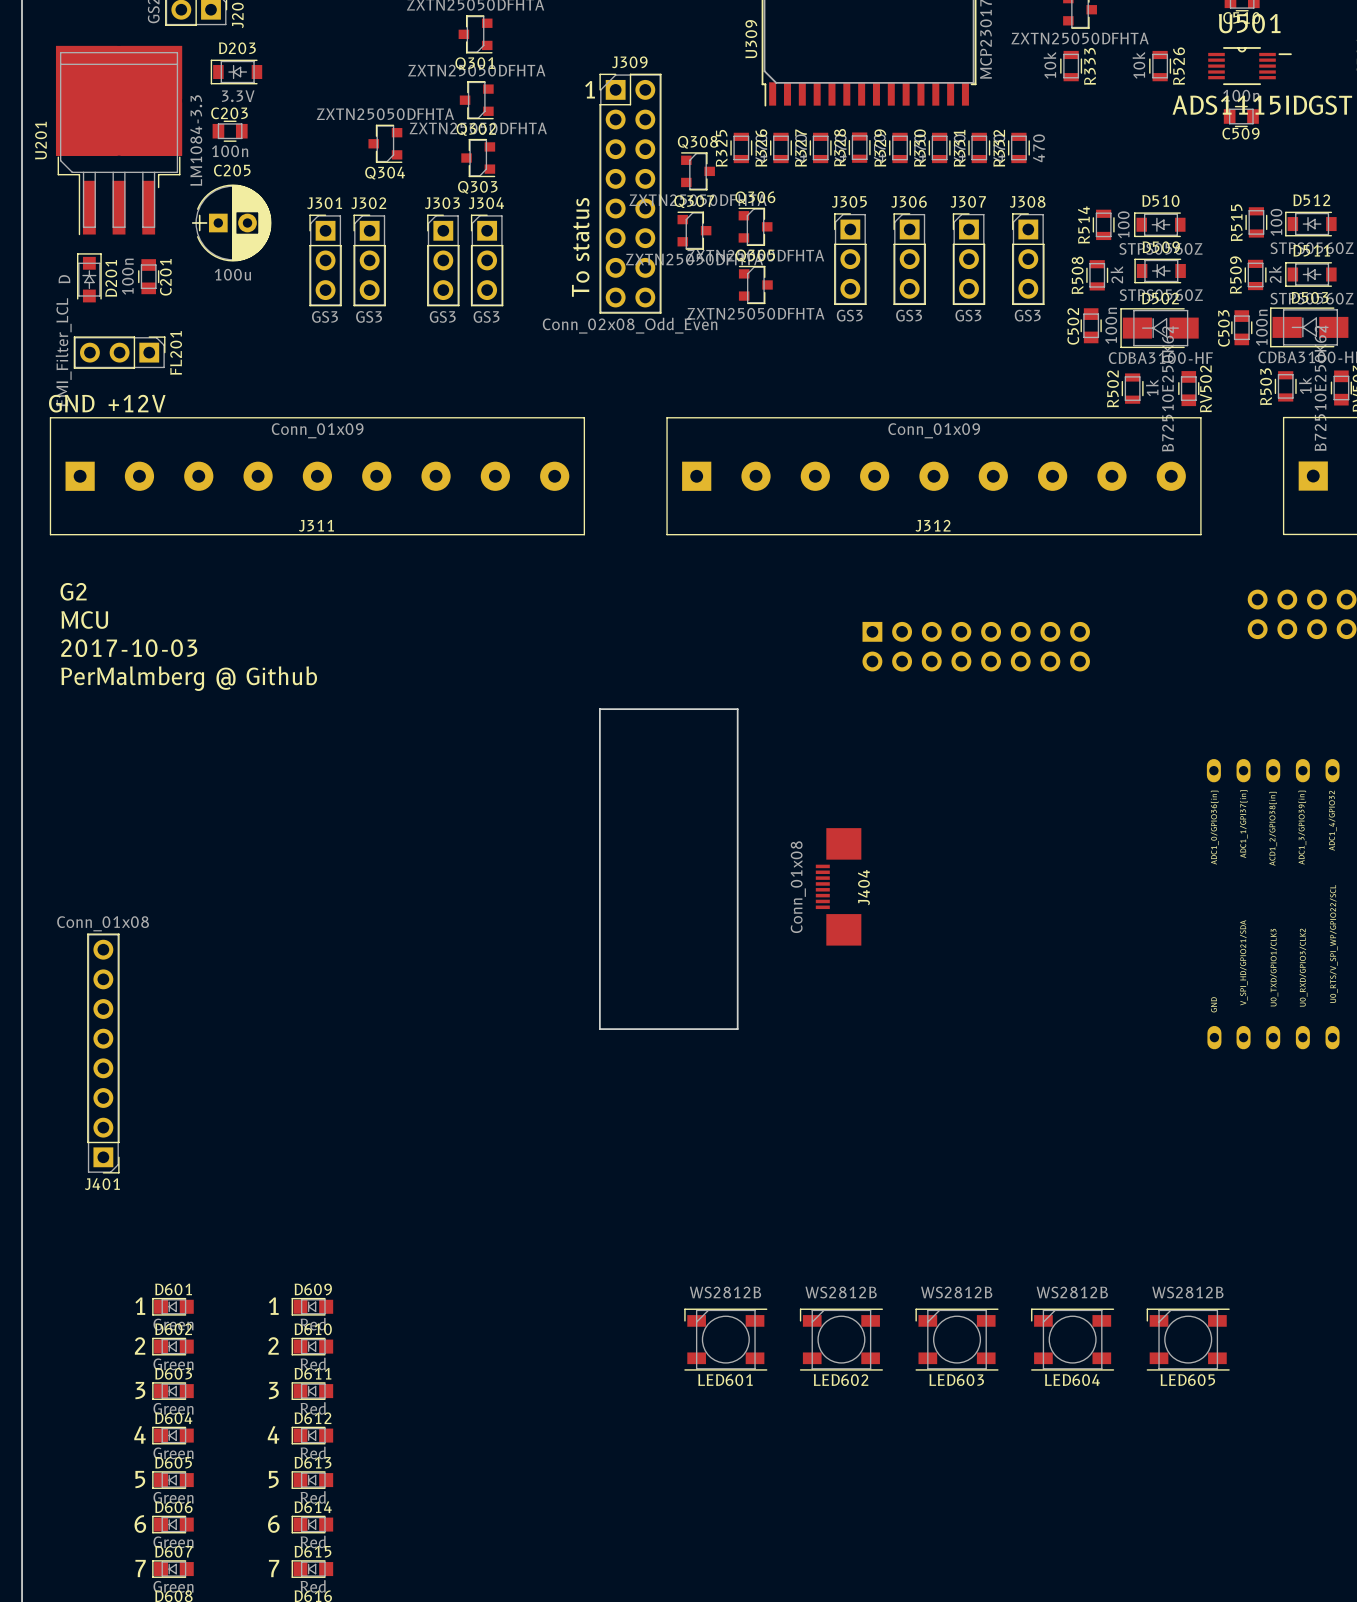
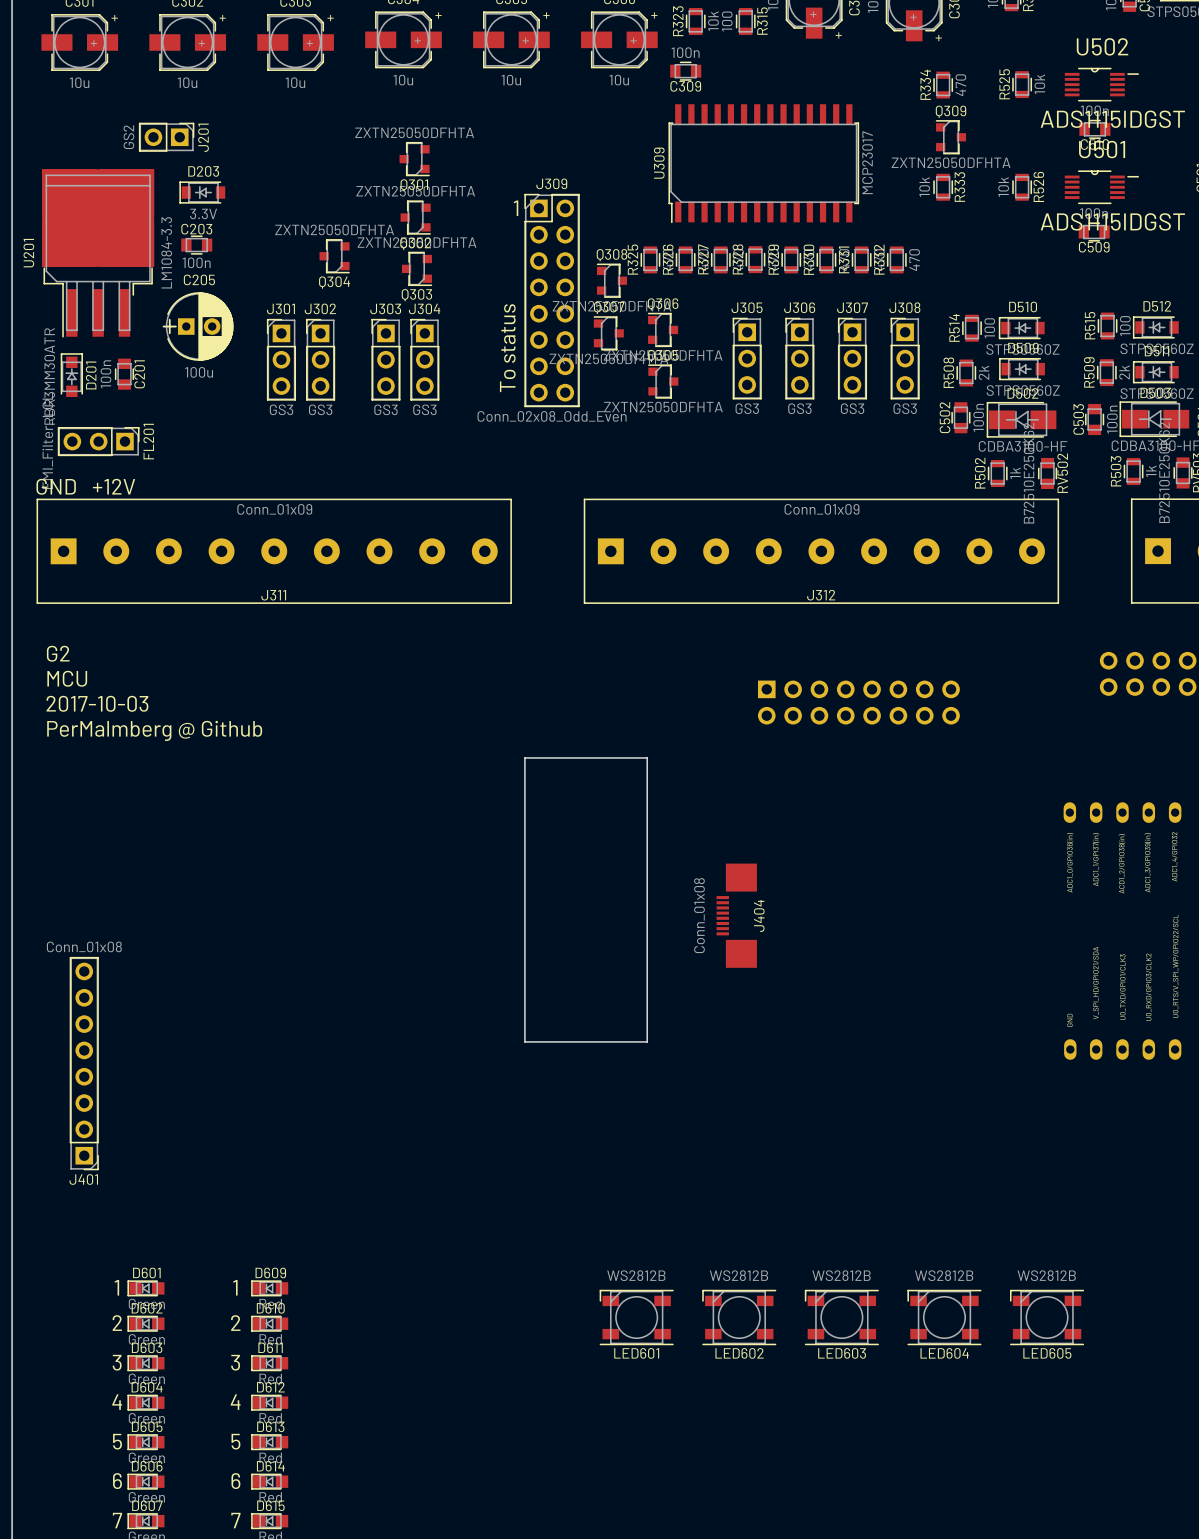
D201 value: D (64, 279) -> RBR3MM30ATR (49, 376)

